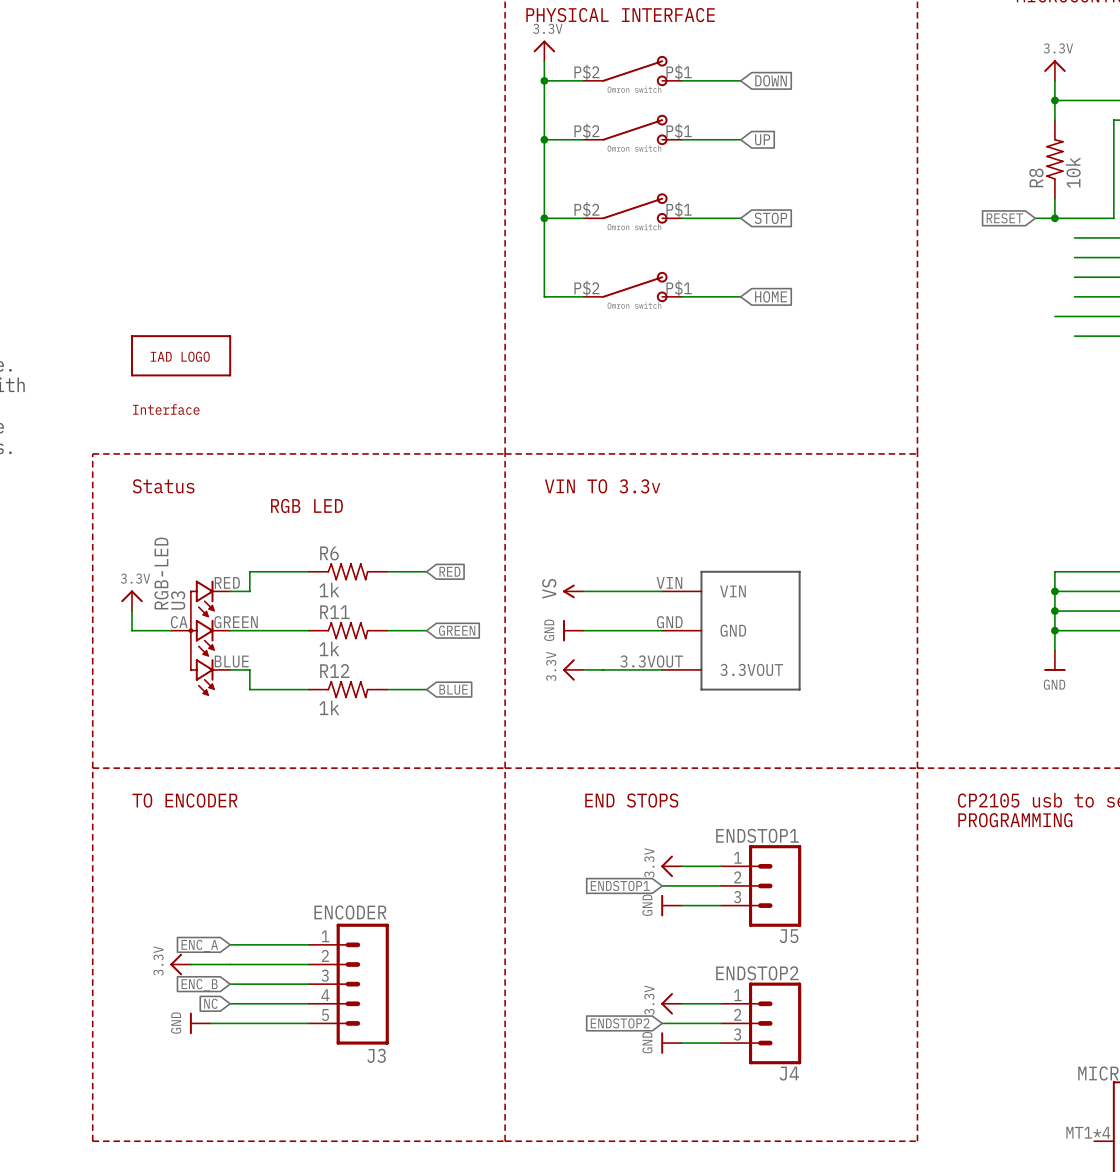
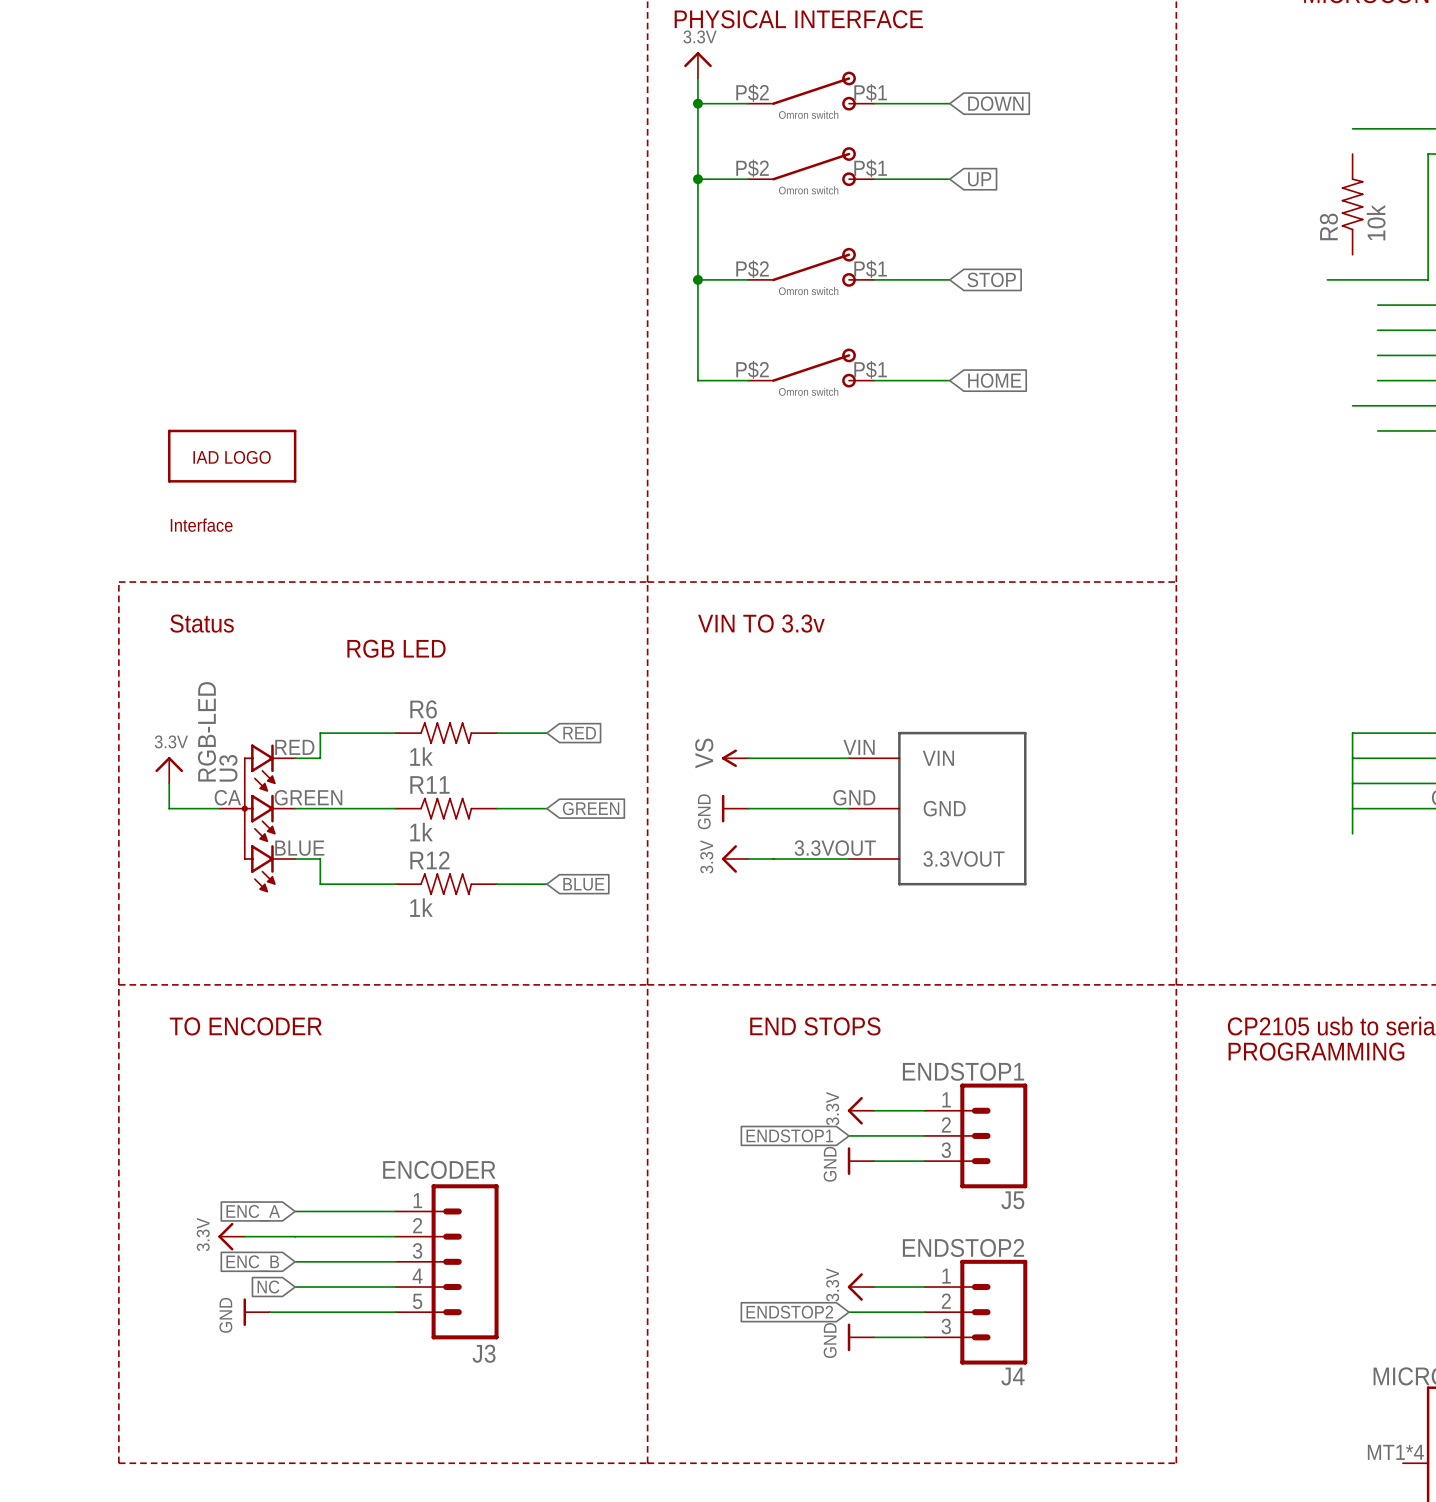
power symbol: 3.3V (1054, 70) -> none
wire: (1054, 80) (1054, 120) -> none
junction: (1054, 100) -> none
wire: (1054, 198) (1054, 218) -> none
global label: RESET (1004, 218) -> none
junction: (1054, 218) -> none
junction: (1054, 591) -> none
junction: (1054, 611) -> none
junction: (1054, 630) -> none
power symbol: GND (1054, 660) -> none

